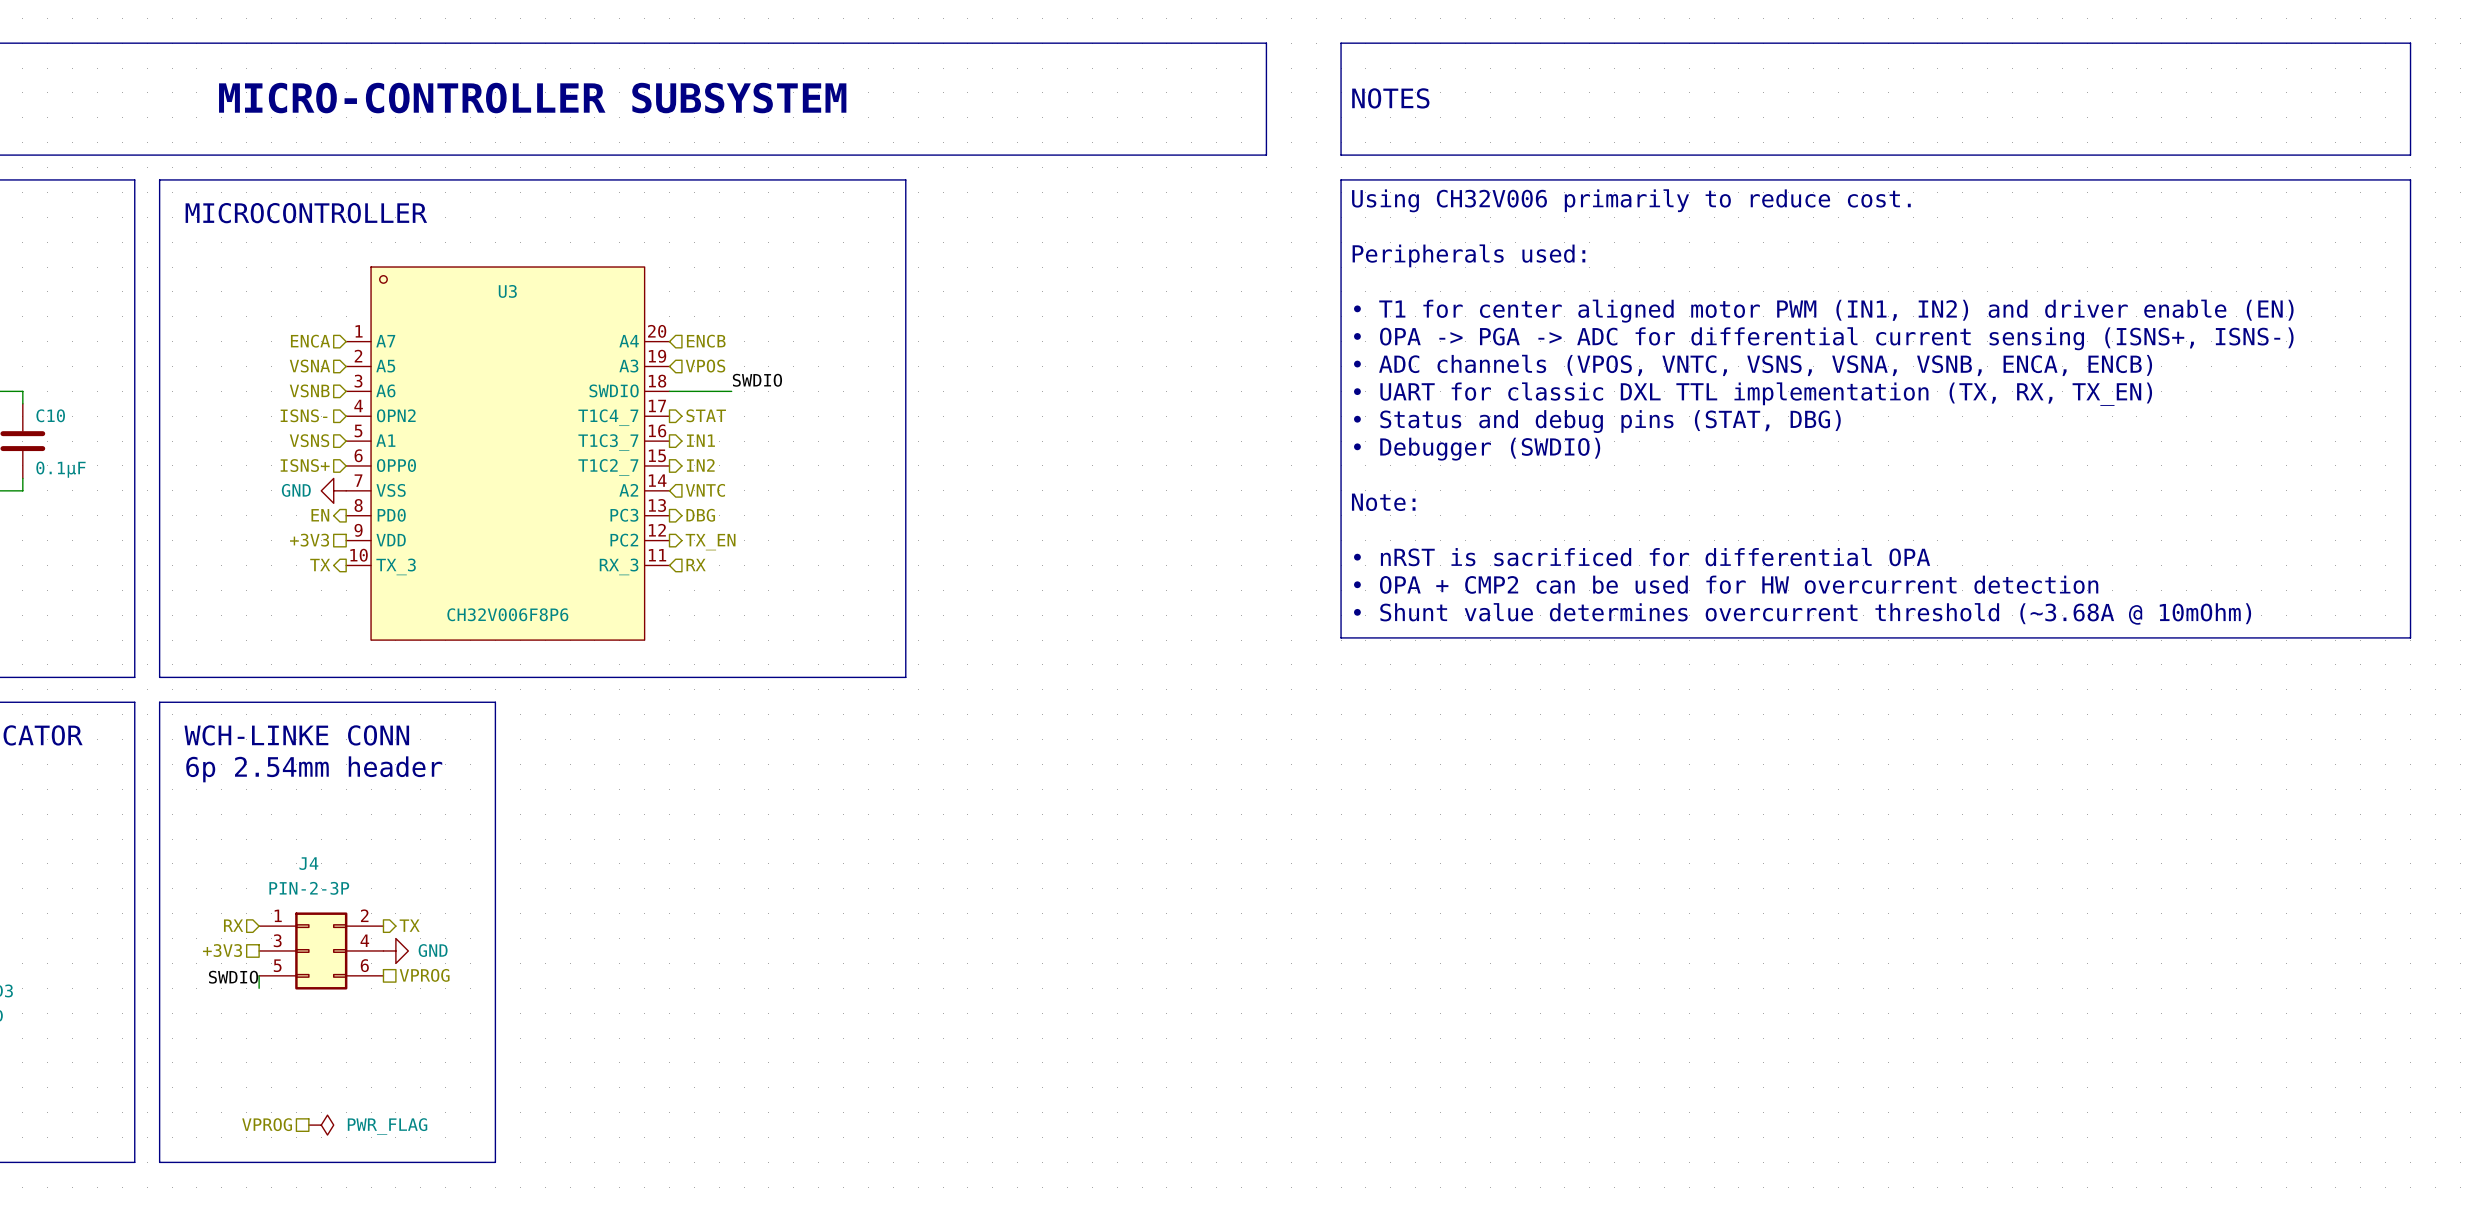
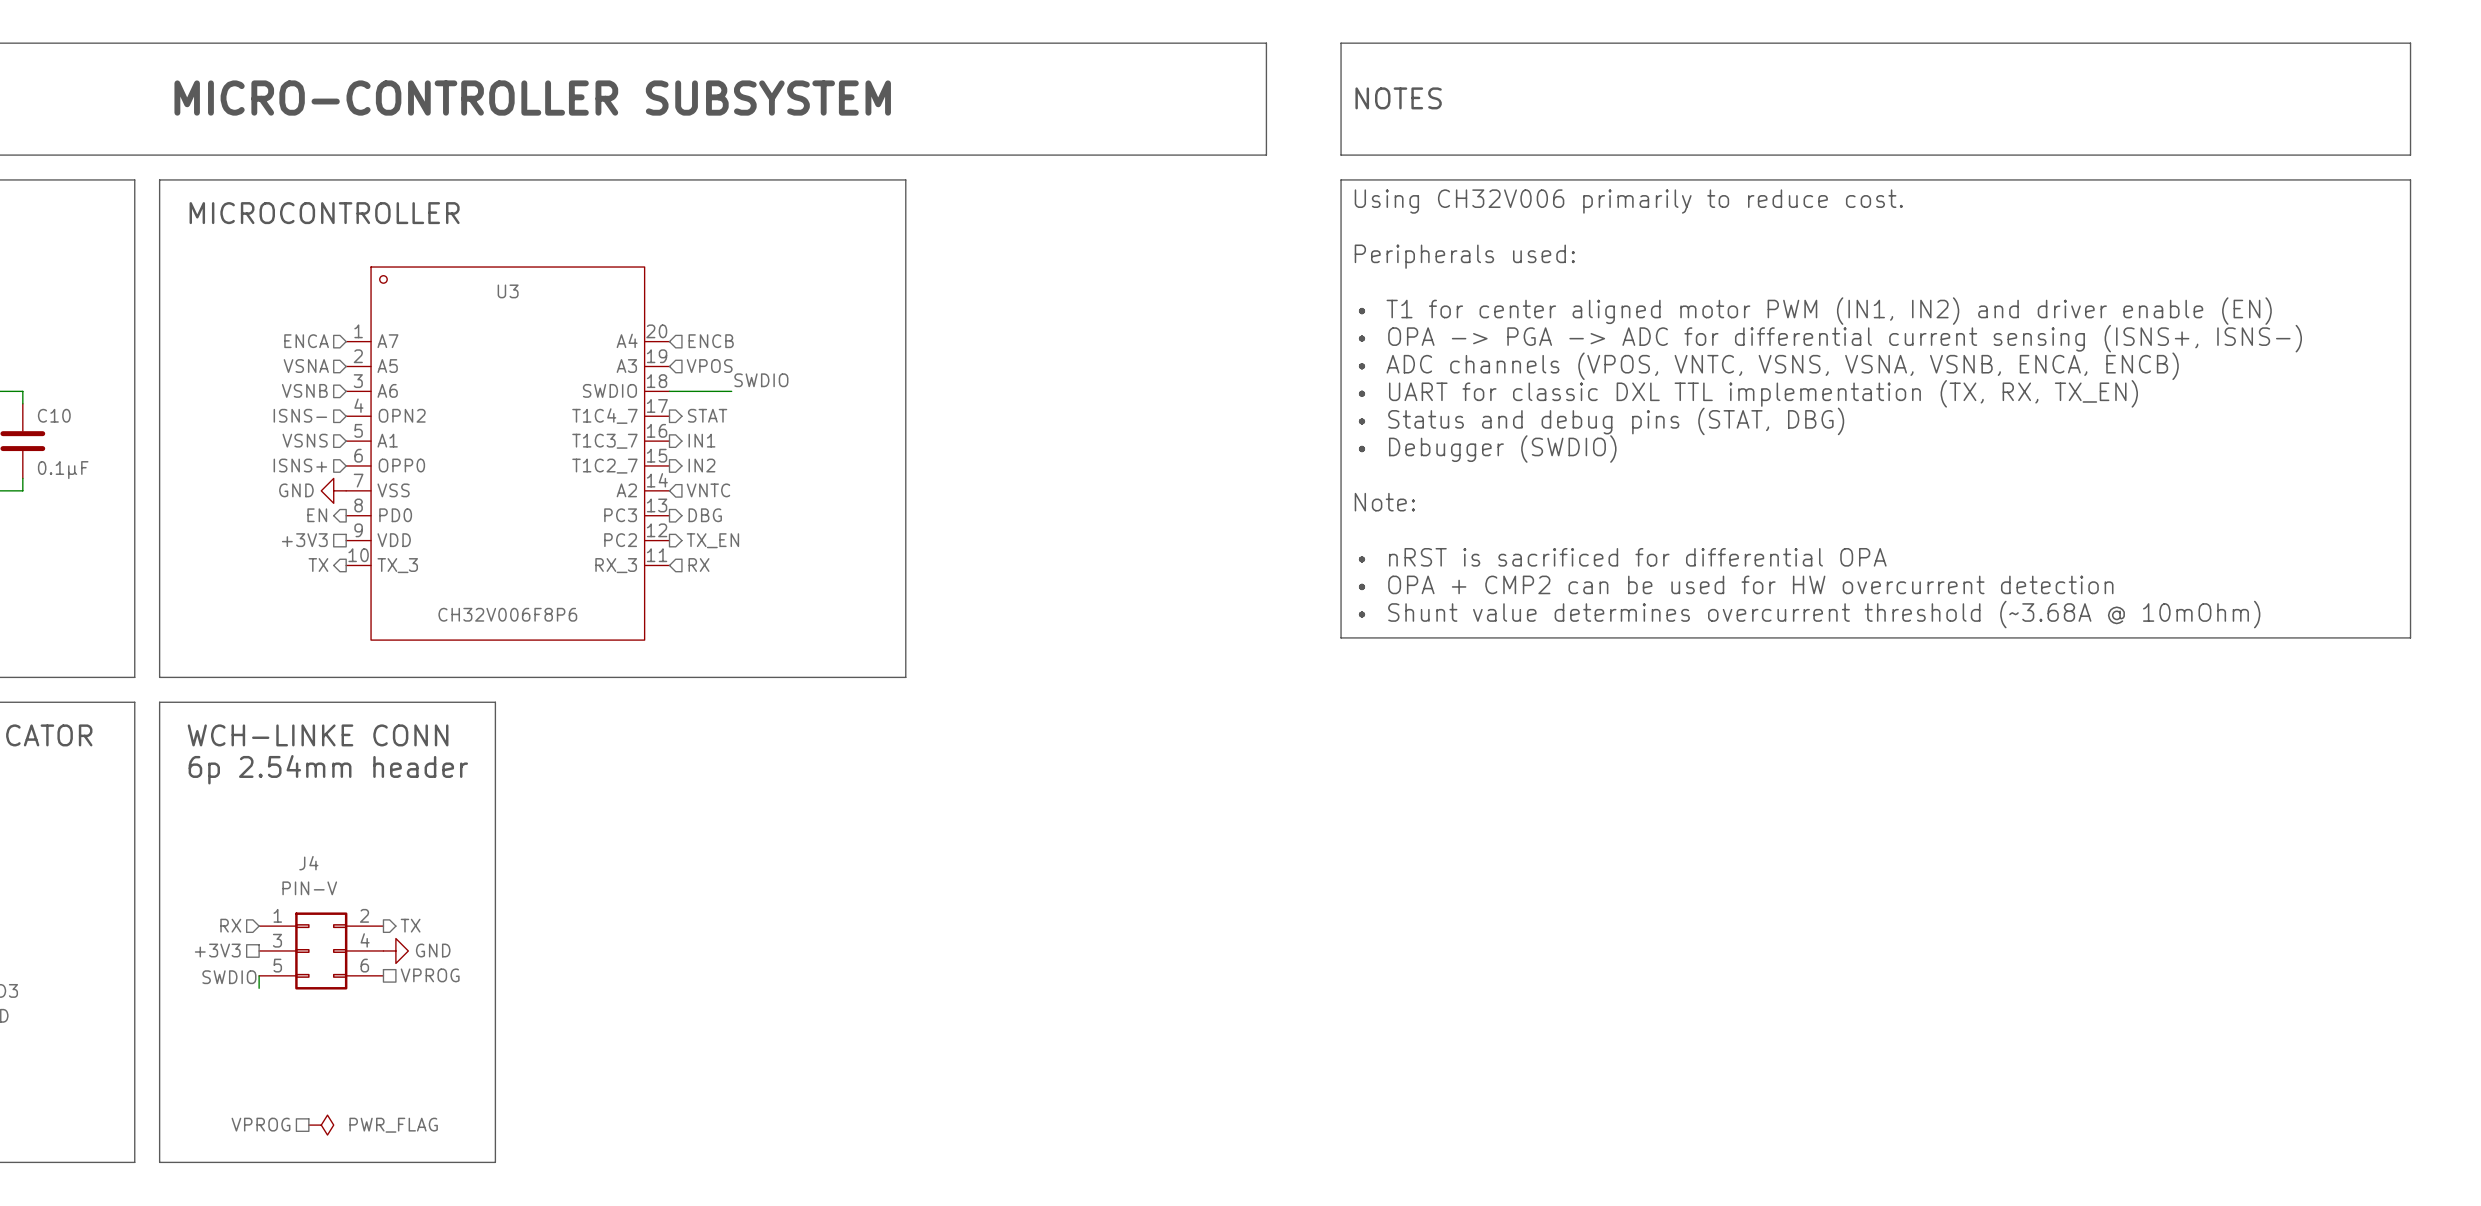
J4 value: PIN-2-3P (309, 888) -> PIN-V (309, 888)

